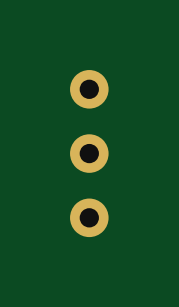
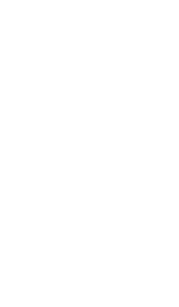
part: (89, 153) -> none

